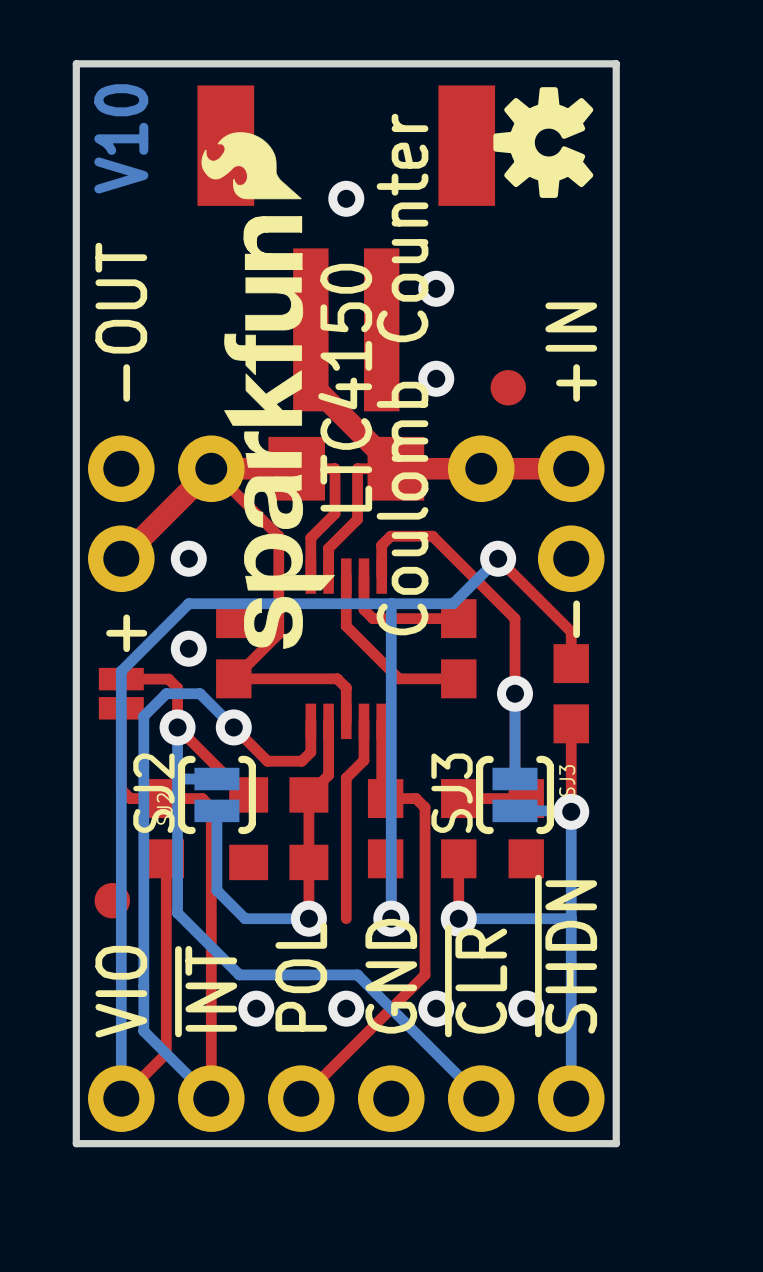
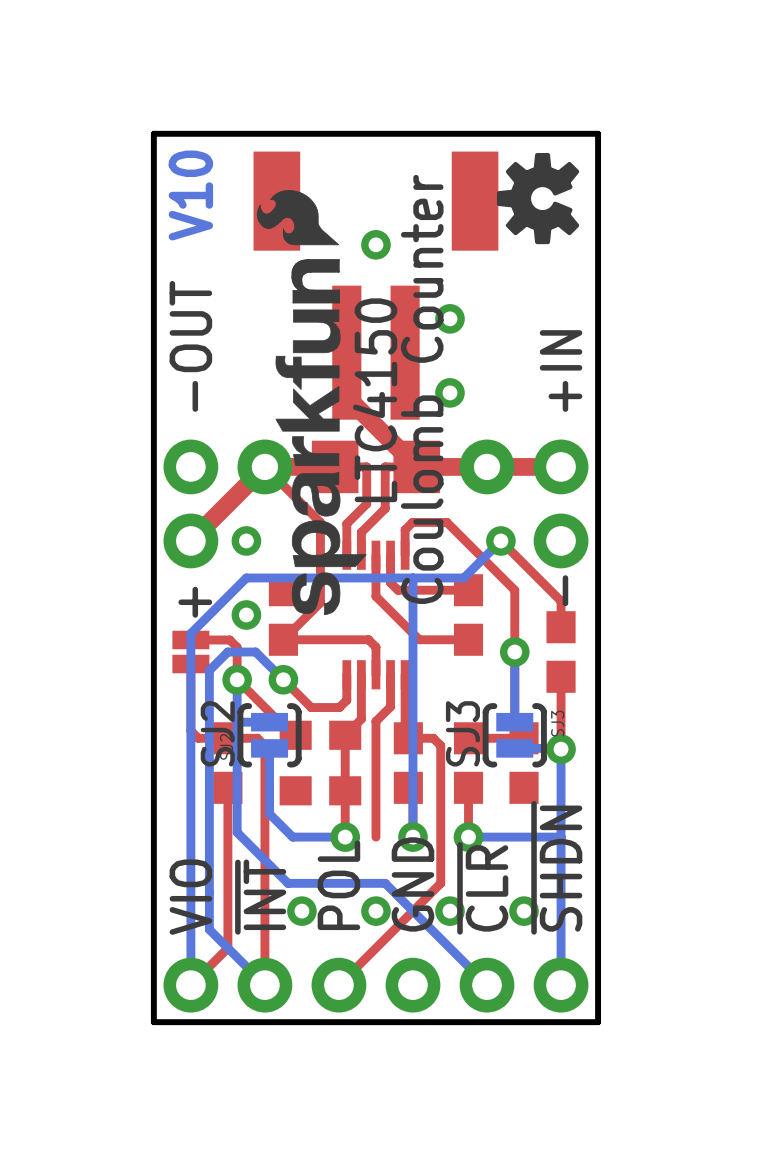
part: (508, 387) -> none
part: (112, 900) -> none

